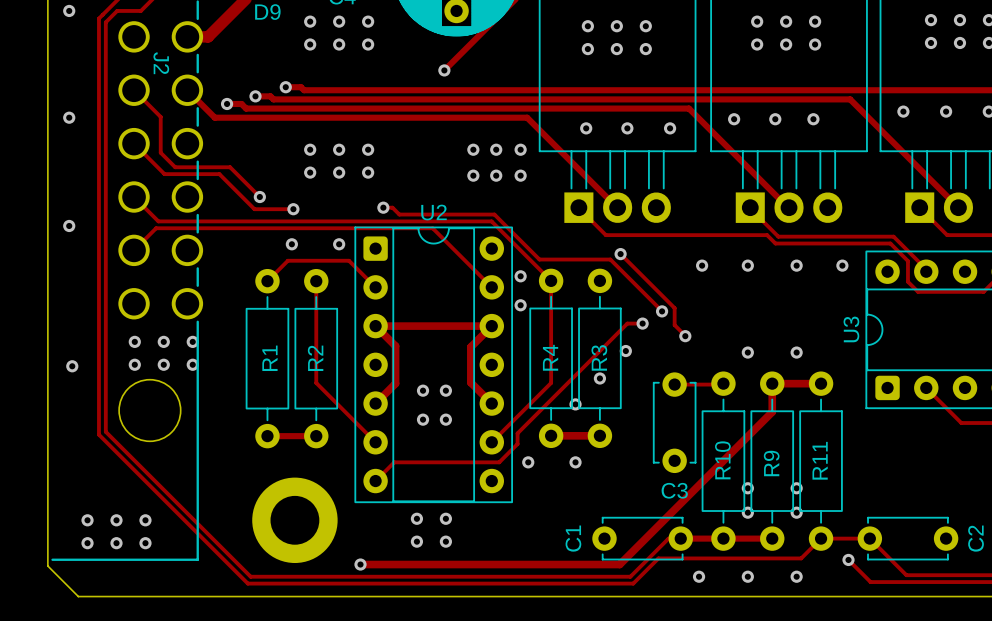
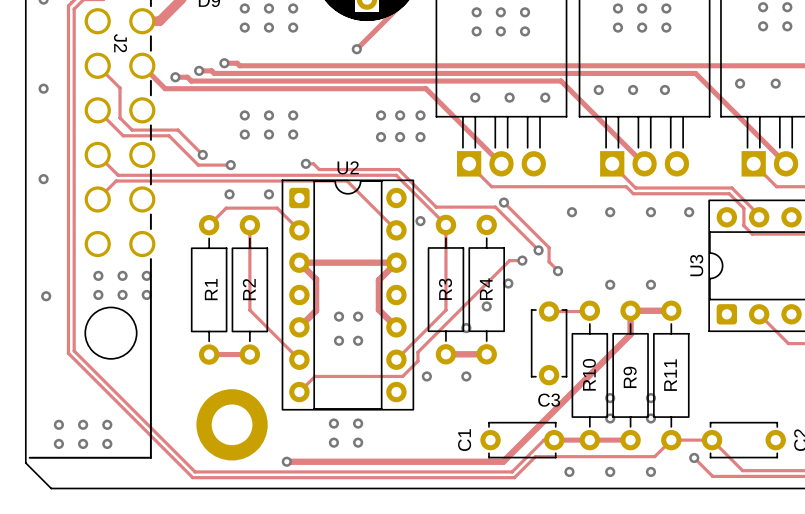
via: (520, 305) -> none
R4 name: R4 (550, 357) -> R3 (445, 289)
R3 name: R3 (599, 357) -> R4 (486, 289)

